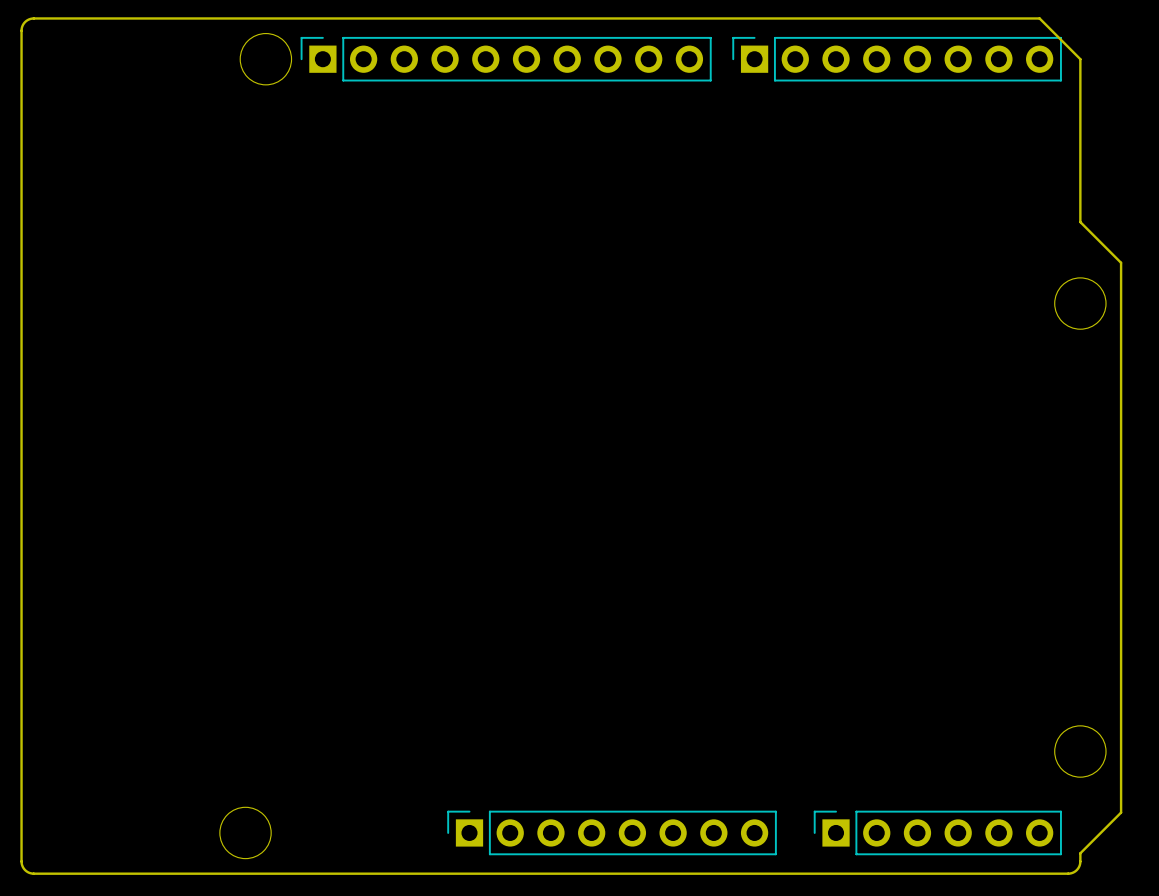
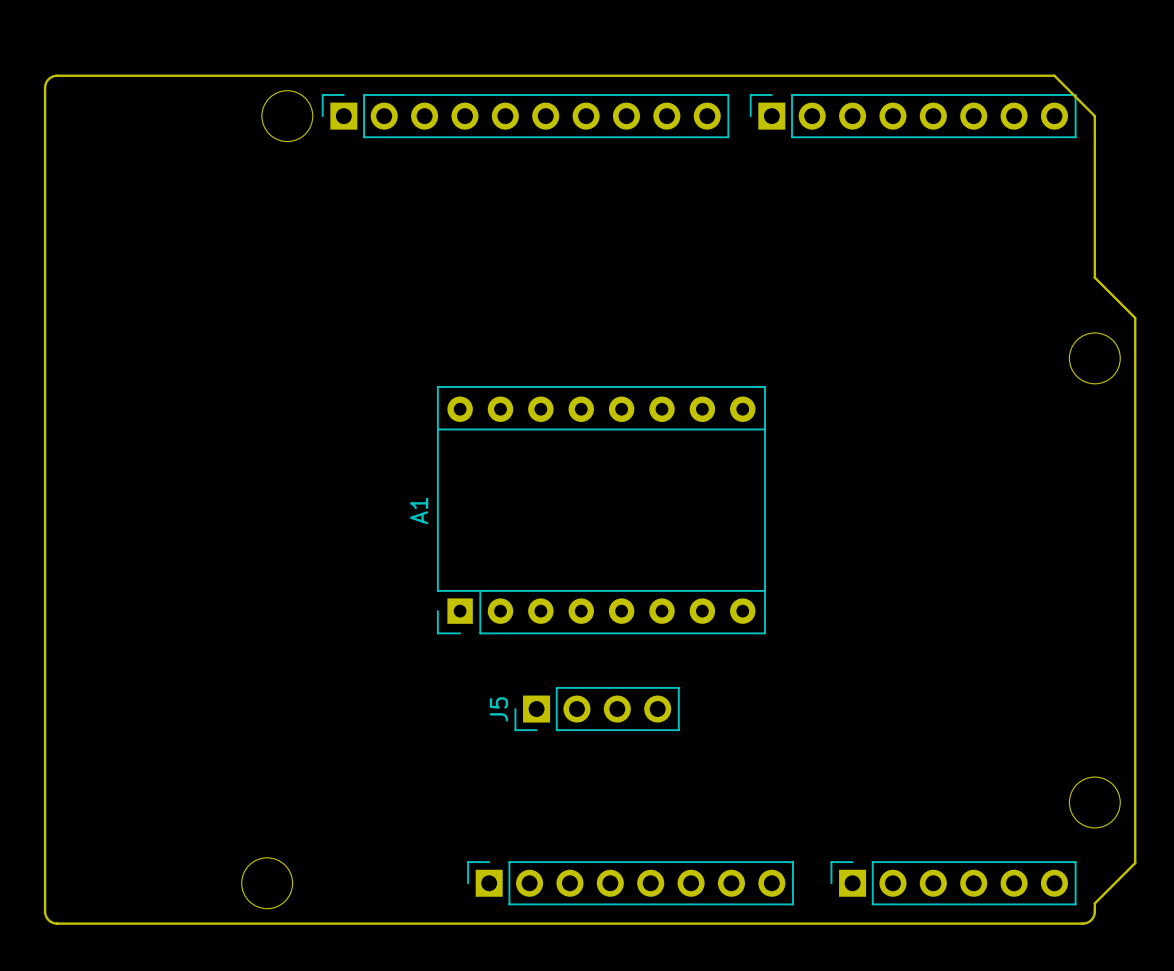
A1: none -> (601, 510)
J5: none -> (597, 709)

